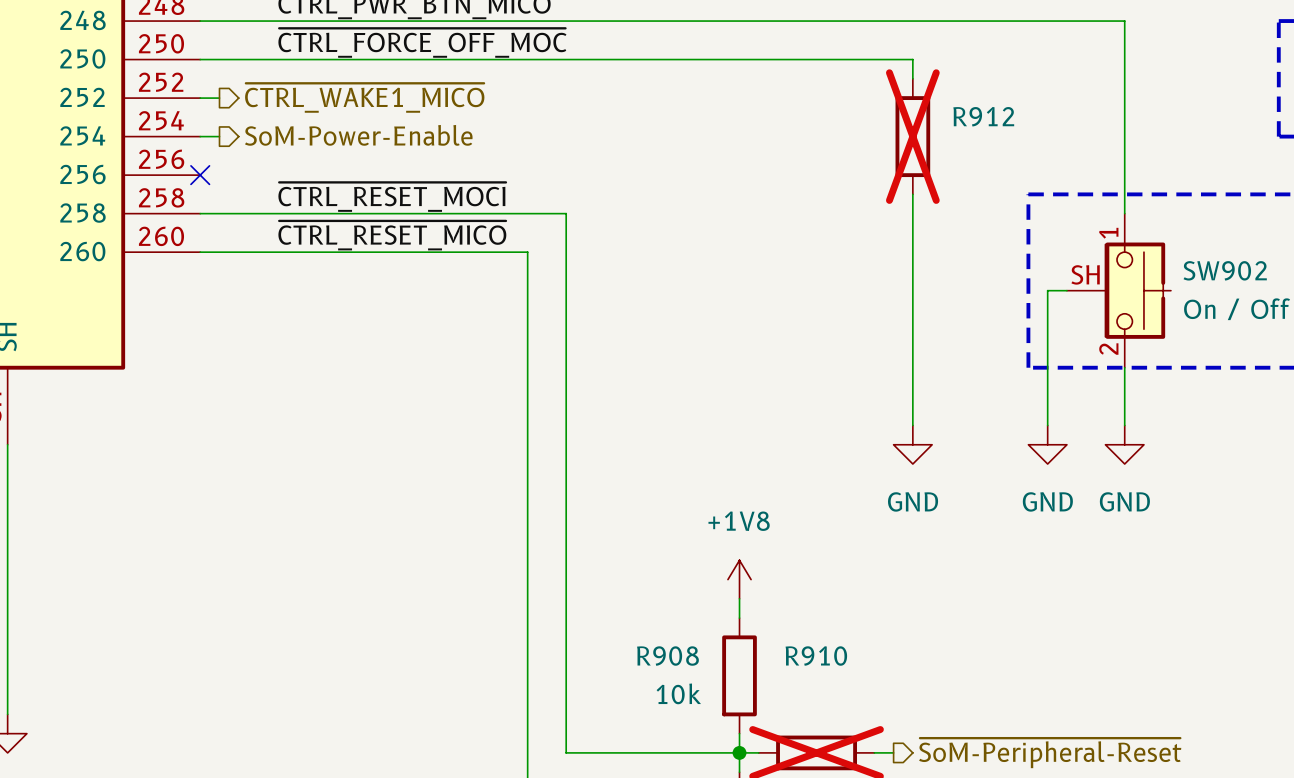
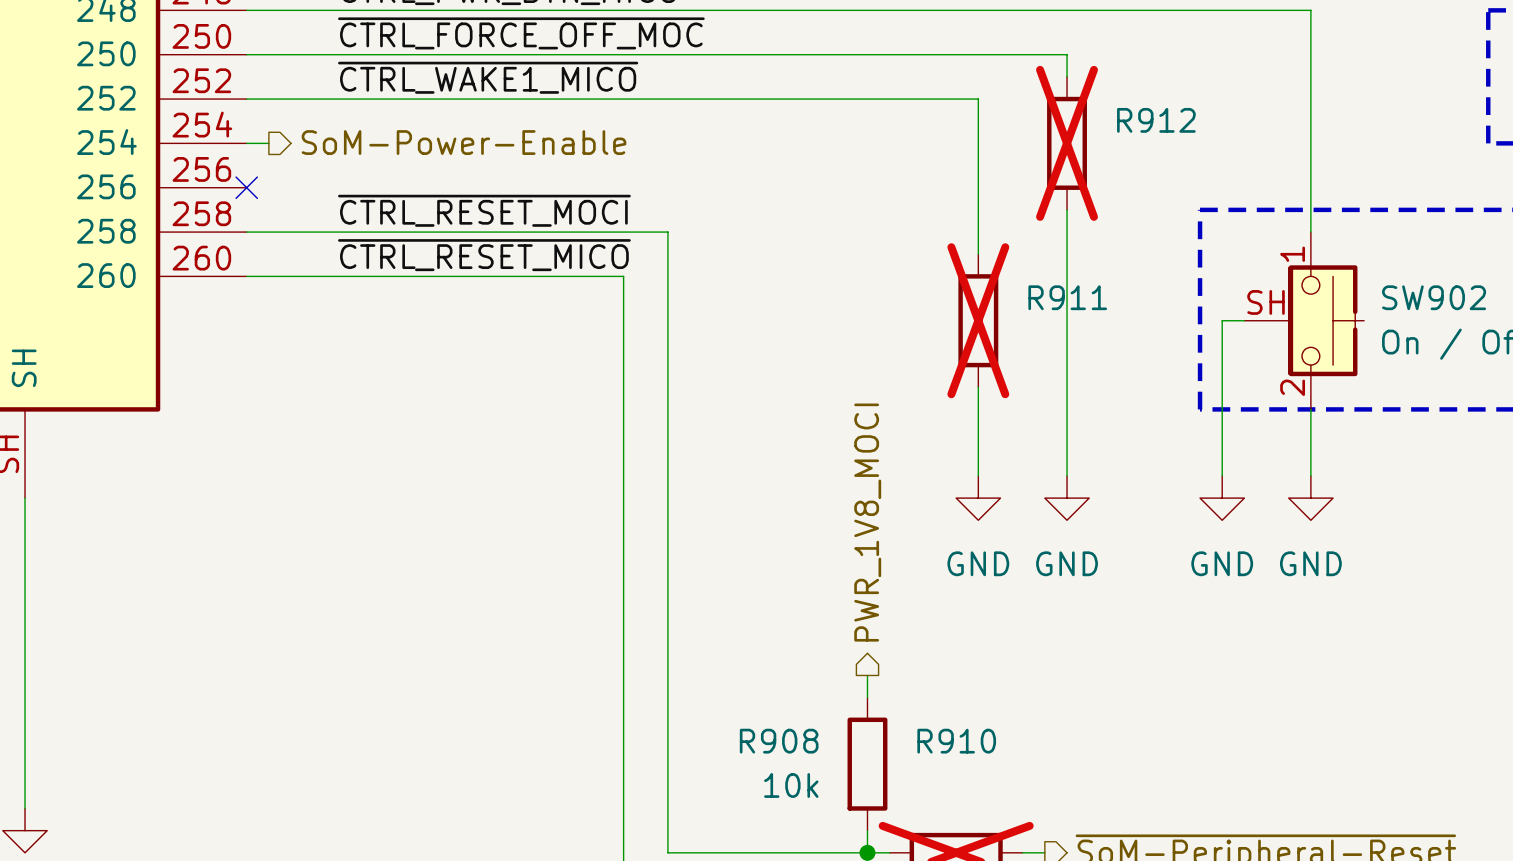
label: none -> ~{CTRL_WAKE1_MICO} (488, 77)
wire: none -> (268, 99) (978, 99) (978, 254)
hierarchical label: ~{CTRL_WAKE1_MICO} (364, 98) -> none
R911: none -> (978, 320)
wire: none -> (978, 387) (978, 475)
power symbol: none -> GND (978, 498)
hierarchical label: none -> PWR_1V8_MOCI (867, 522)
power symbol: +1V8 (739, 579) -> none

